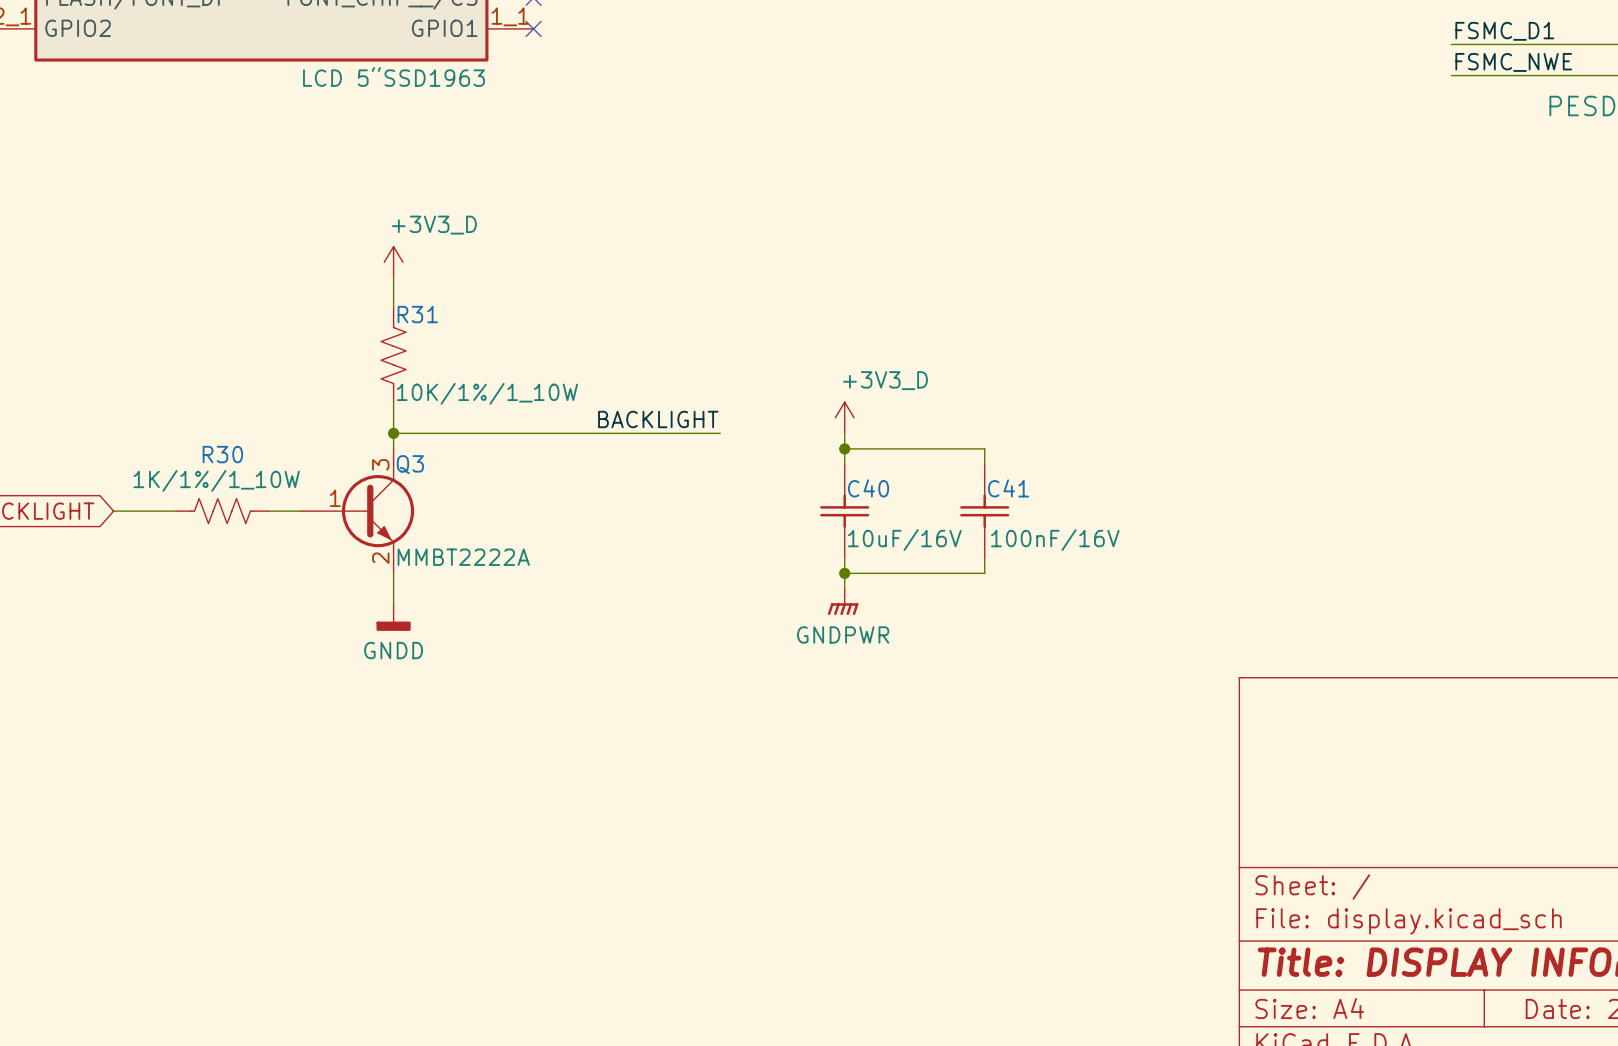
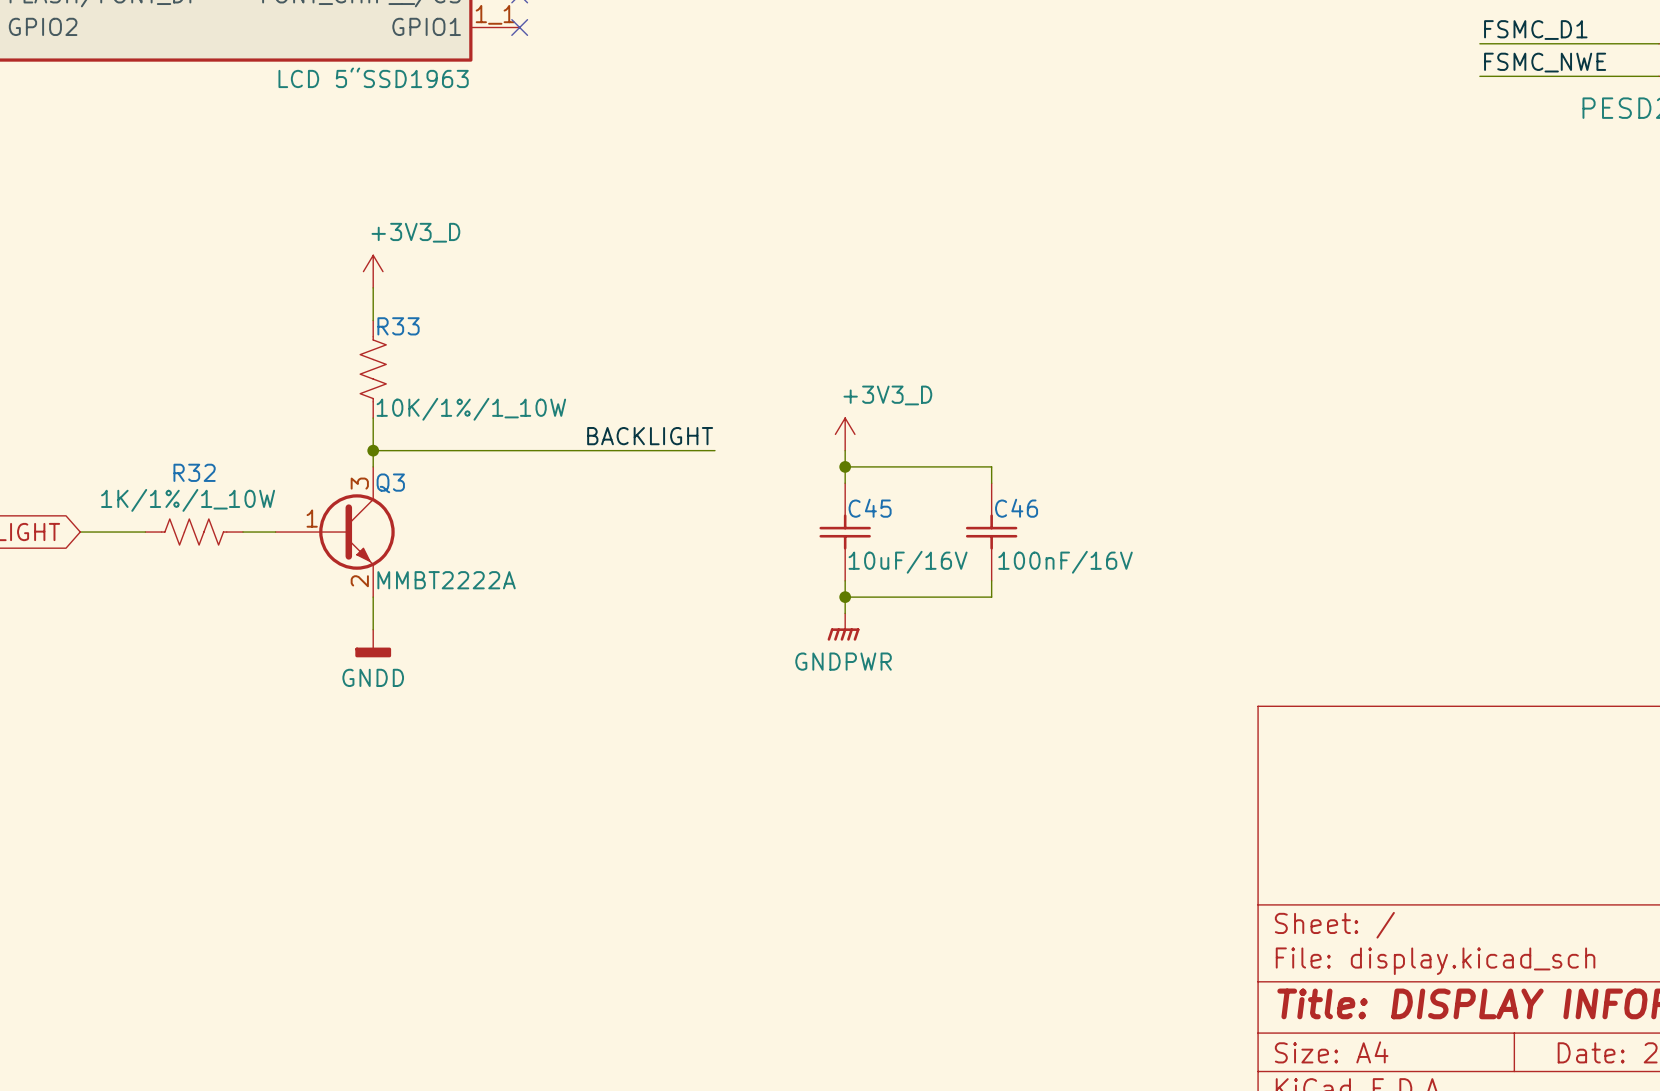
R31 name: R31 (417, 314) -> R33 (398, 326)
R30 name: R30 (222, 454) -> R32 (194, 472)
C40 name: C40 (868, 488) -> C45 (870, 508)
C41 name: C41 (1008, 488) -> C46 (1016, 508)

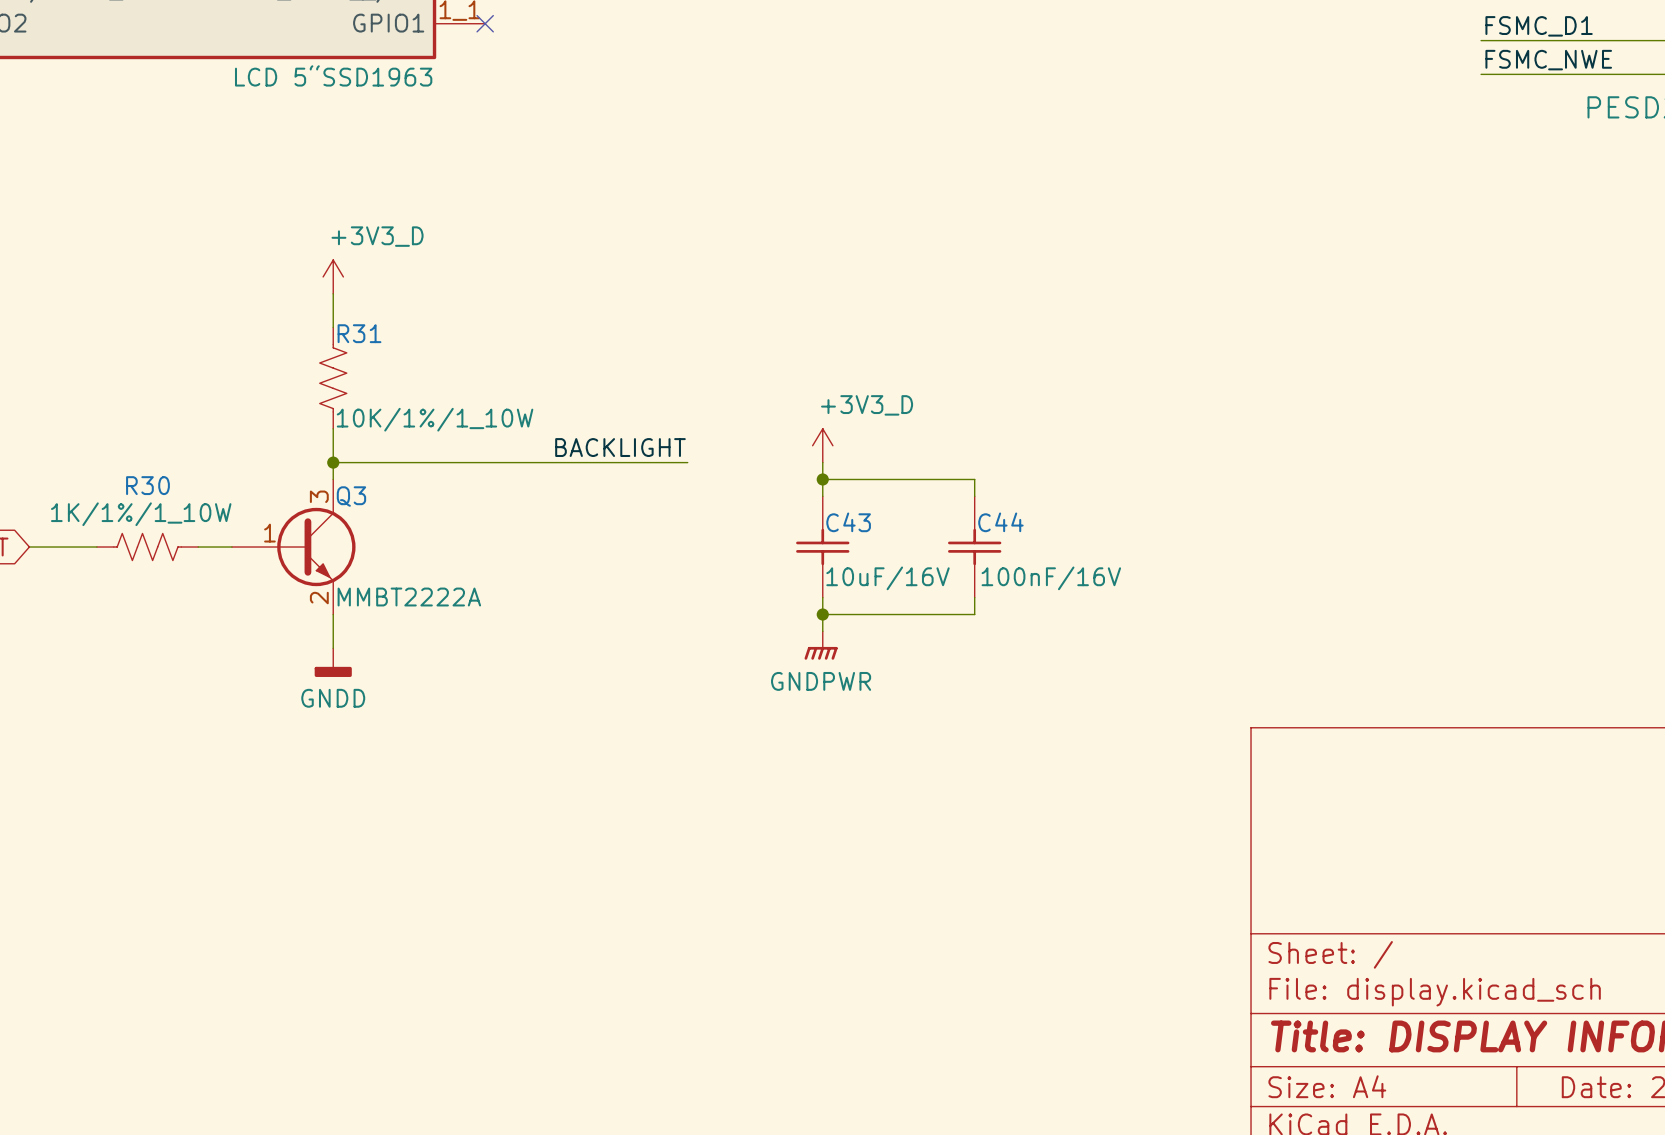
R33 name: R33 (398, 326) -> R31 (359, 333)
R32 name: R32 (194, 472) -> R30 (147, 485)
C45 name: C45 (870, 508) -> C43 (848, 522)
C46 name: C46 (1016, 508) -> C44 (1000, 522)

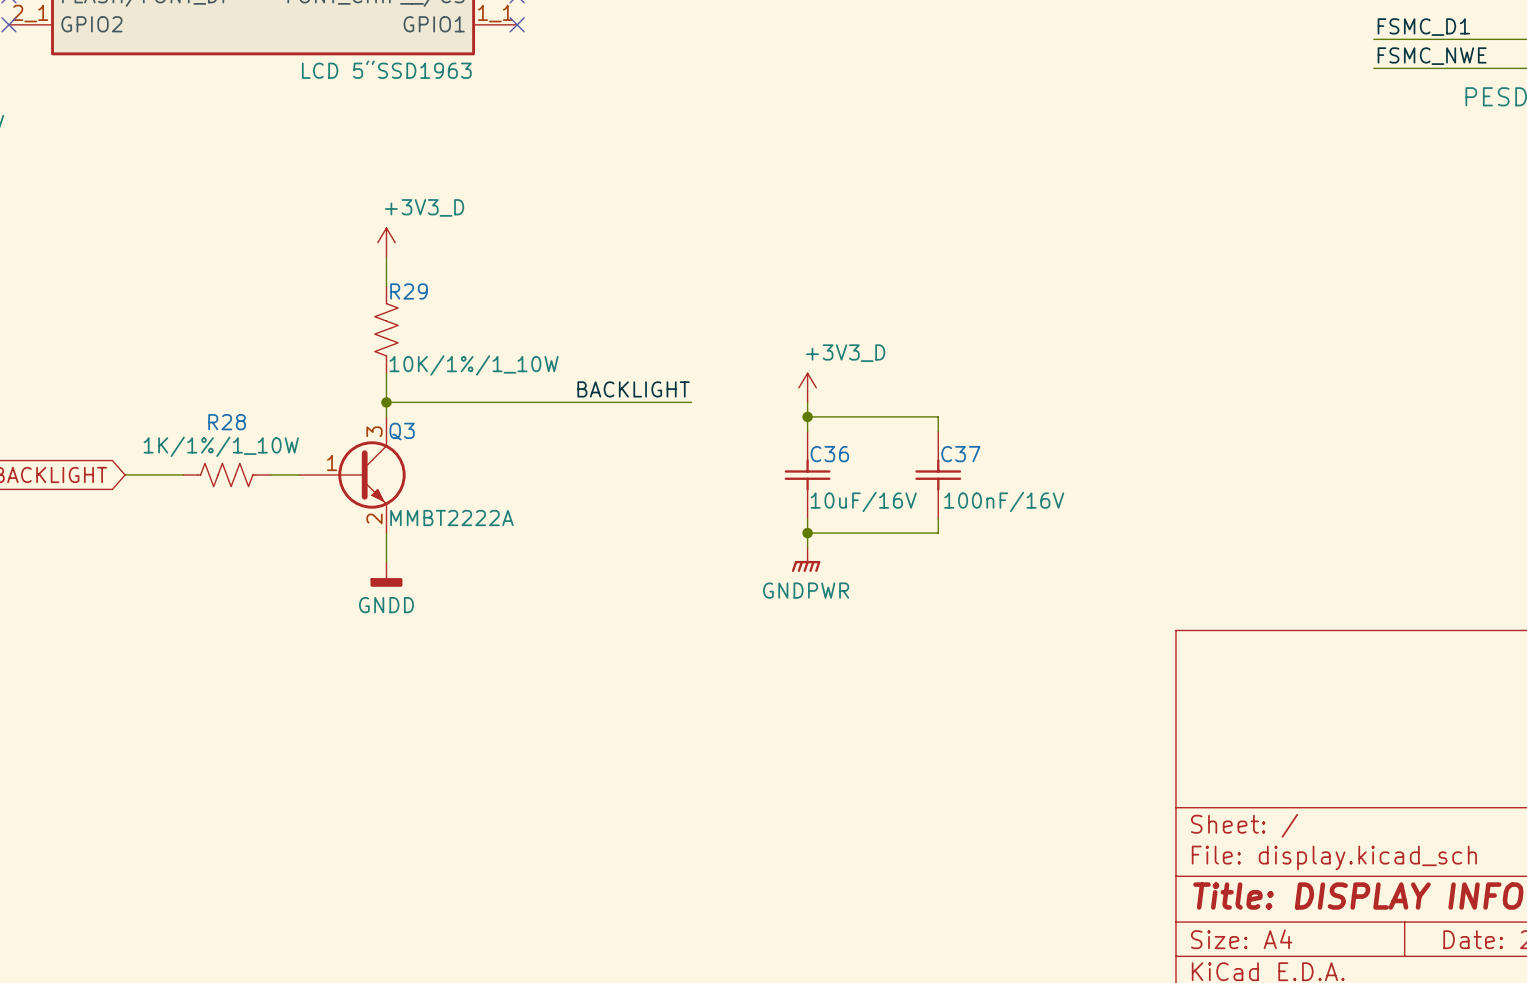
R31 name: R31 (359, 333) -> R29 (409, 291)
R30 name: R30 (147, 485) -> R28 (227, 422)
C43 name: C43 (848, 522) -> C36 (829, 454)
C44 name: C44 (1000, 522) -> C37 (960, 454)

